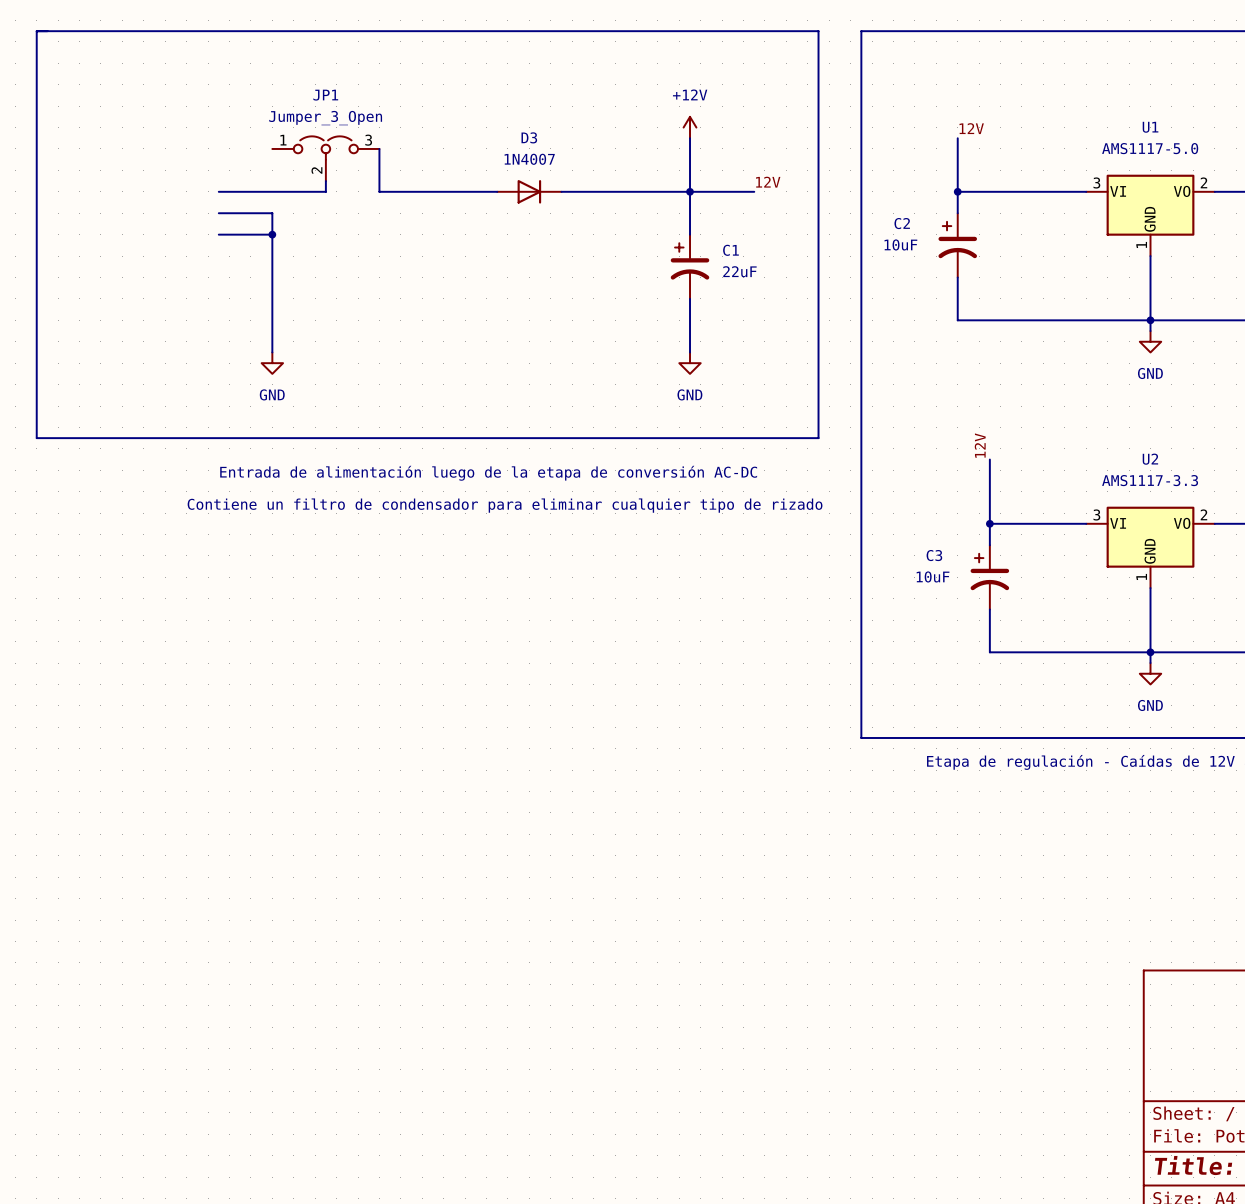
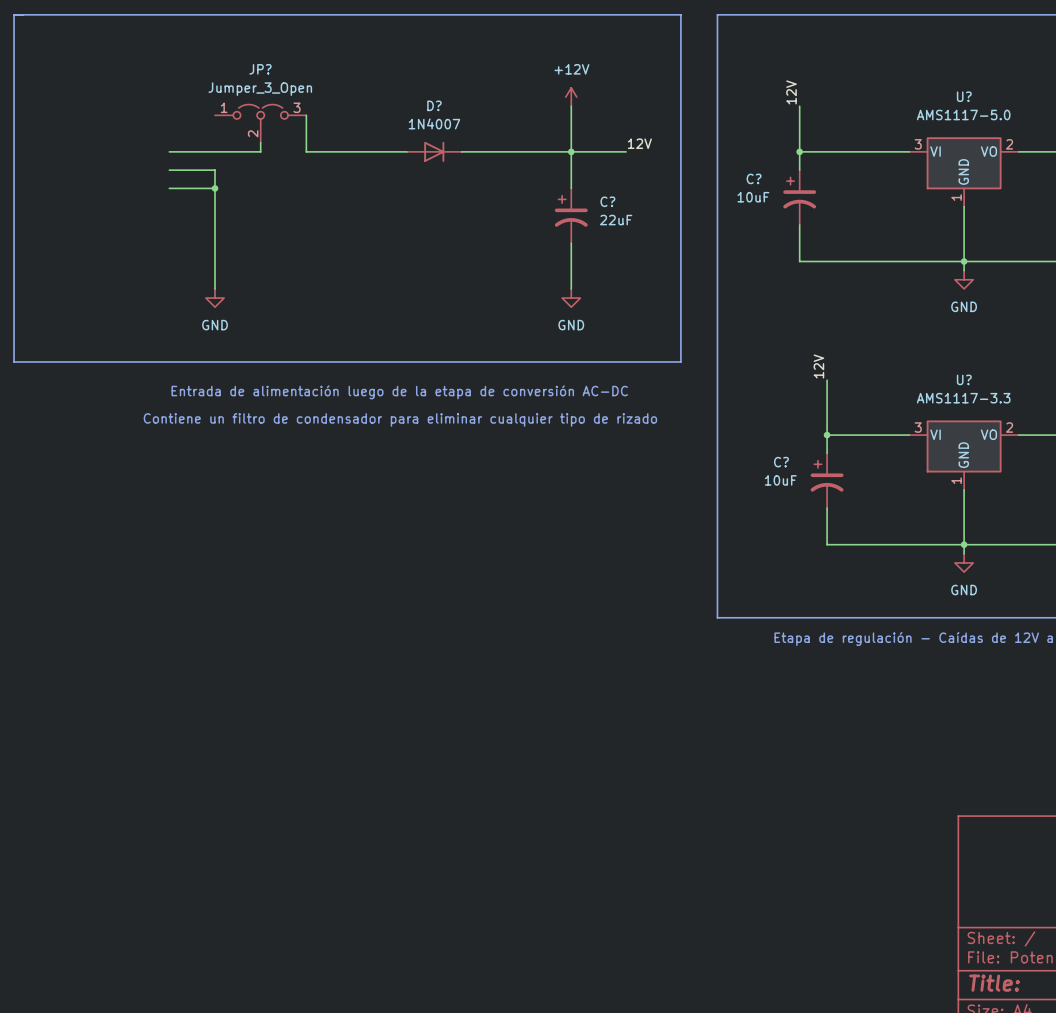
JP1 name: JP1 (325, 95) -> JP? (260, 69)
U1 name: U1 (1150, 127) -> U? (964, 96)
label rotation: 0° (971, 128) -> 90° counterclockwise (791, 92)
D3 name: D3 (529, 137) -> D? (434, 105)
C2 name: C2 (902, 223) -> C? (754, 178)
C1 name: C1 (730, 250) -> C? (607, 201)
U2 name: U2 (1150, 459) -> U? (964, 379)
C3 name: C3 (934, 555) -> C? (781, 462)

